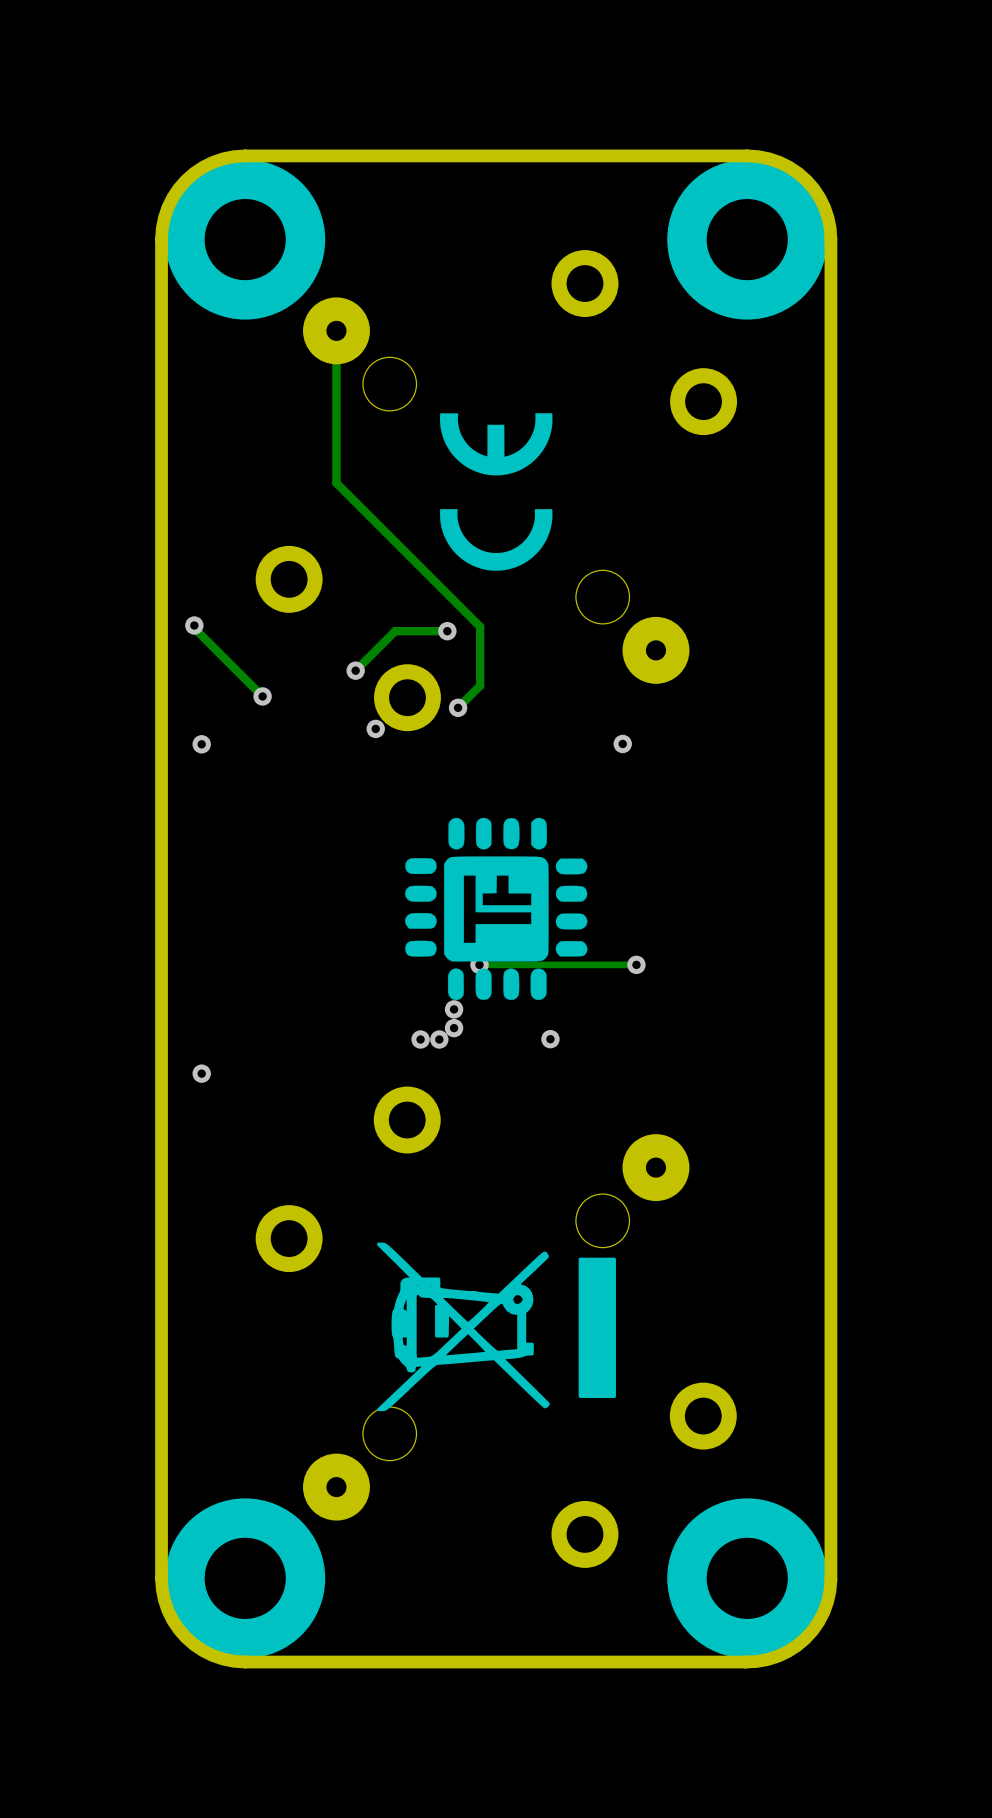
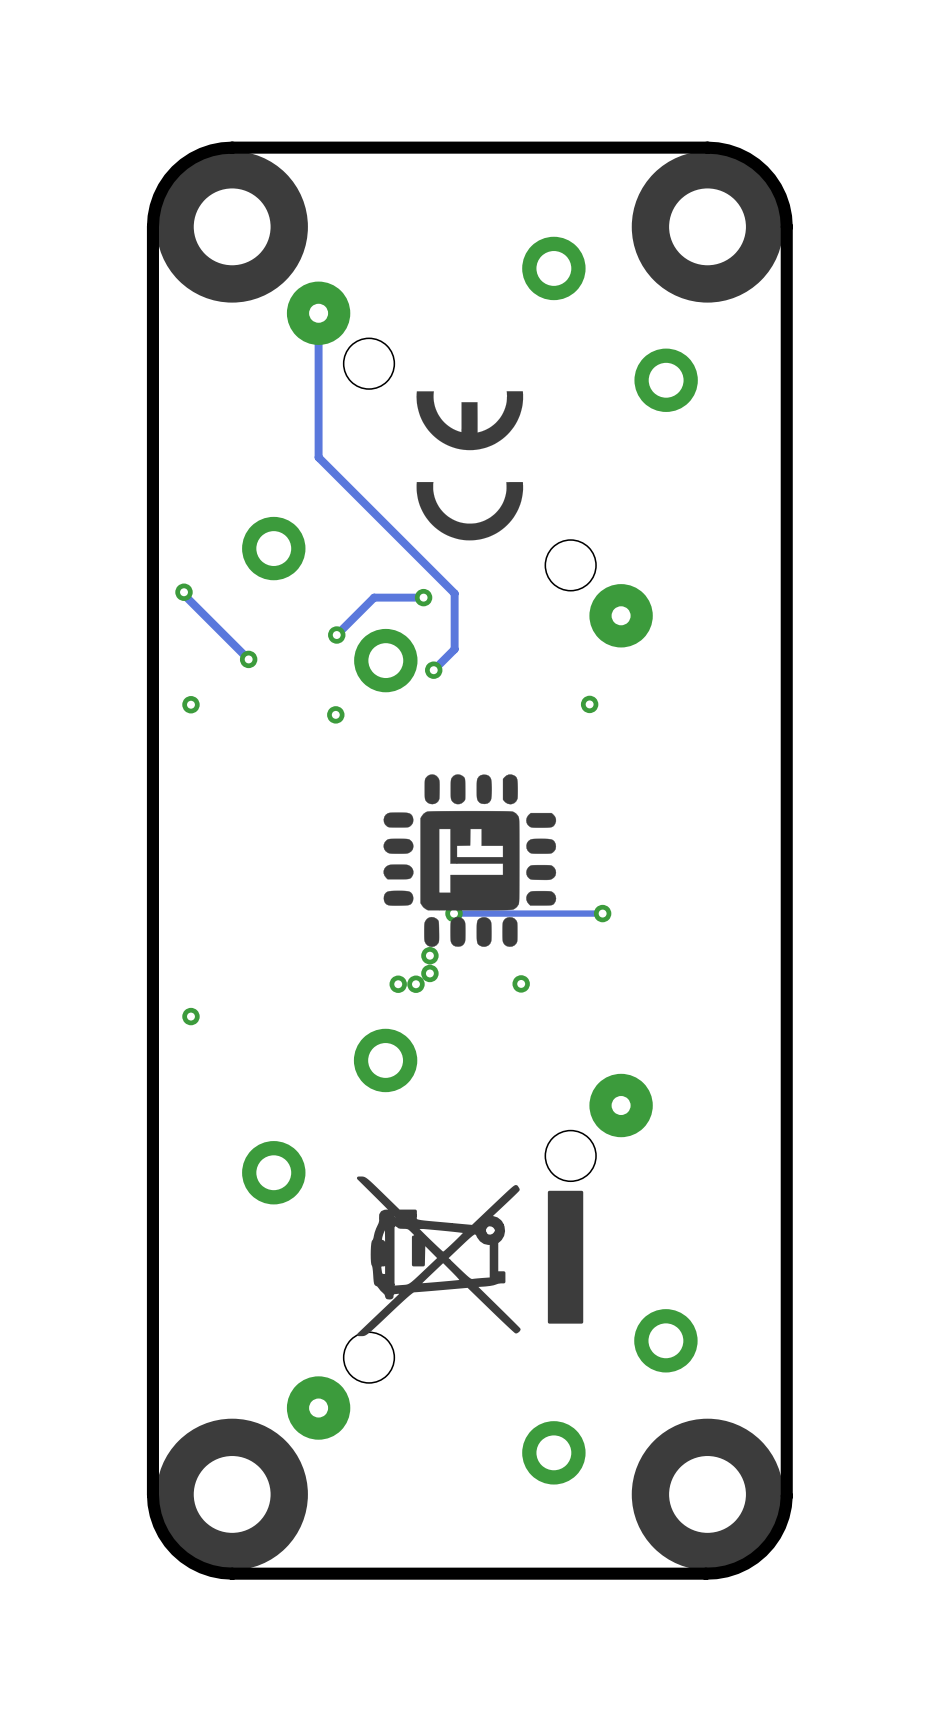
via position: (375, 728) -> (335, 714)

